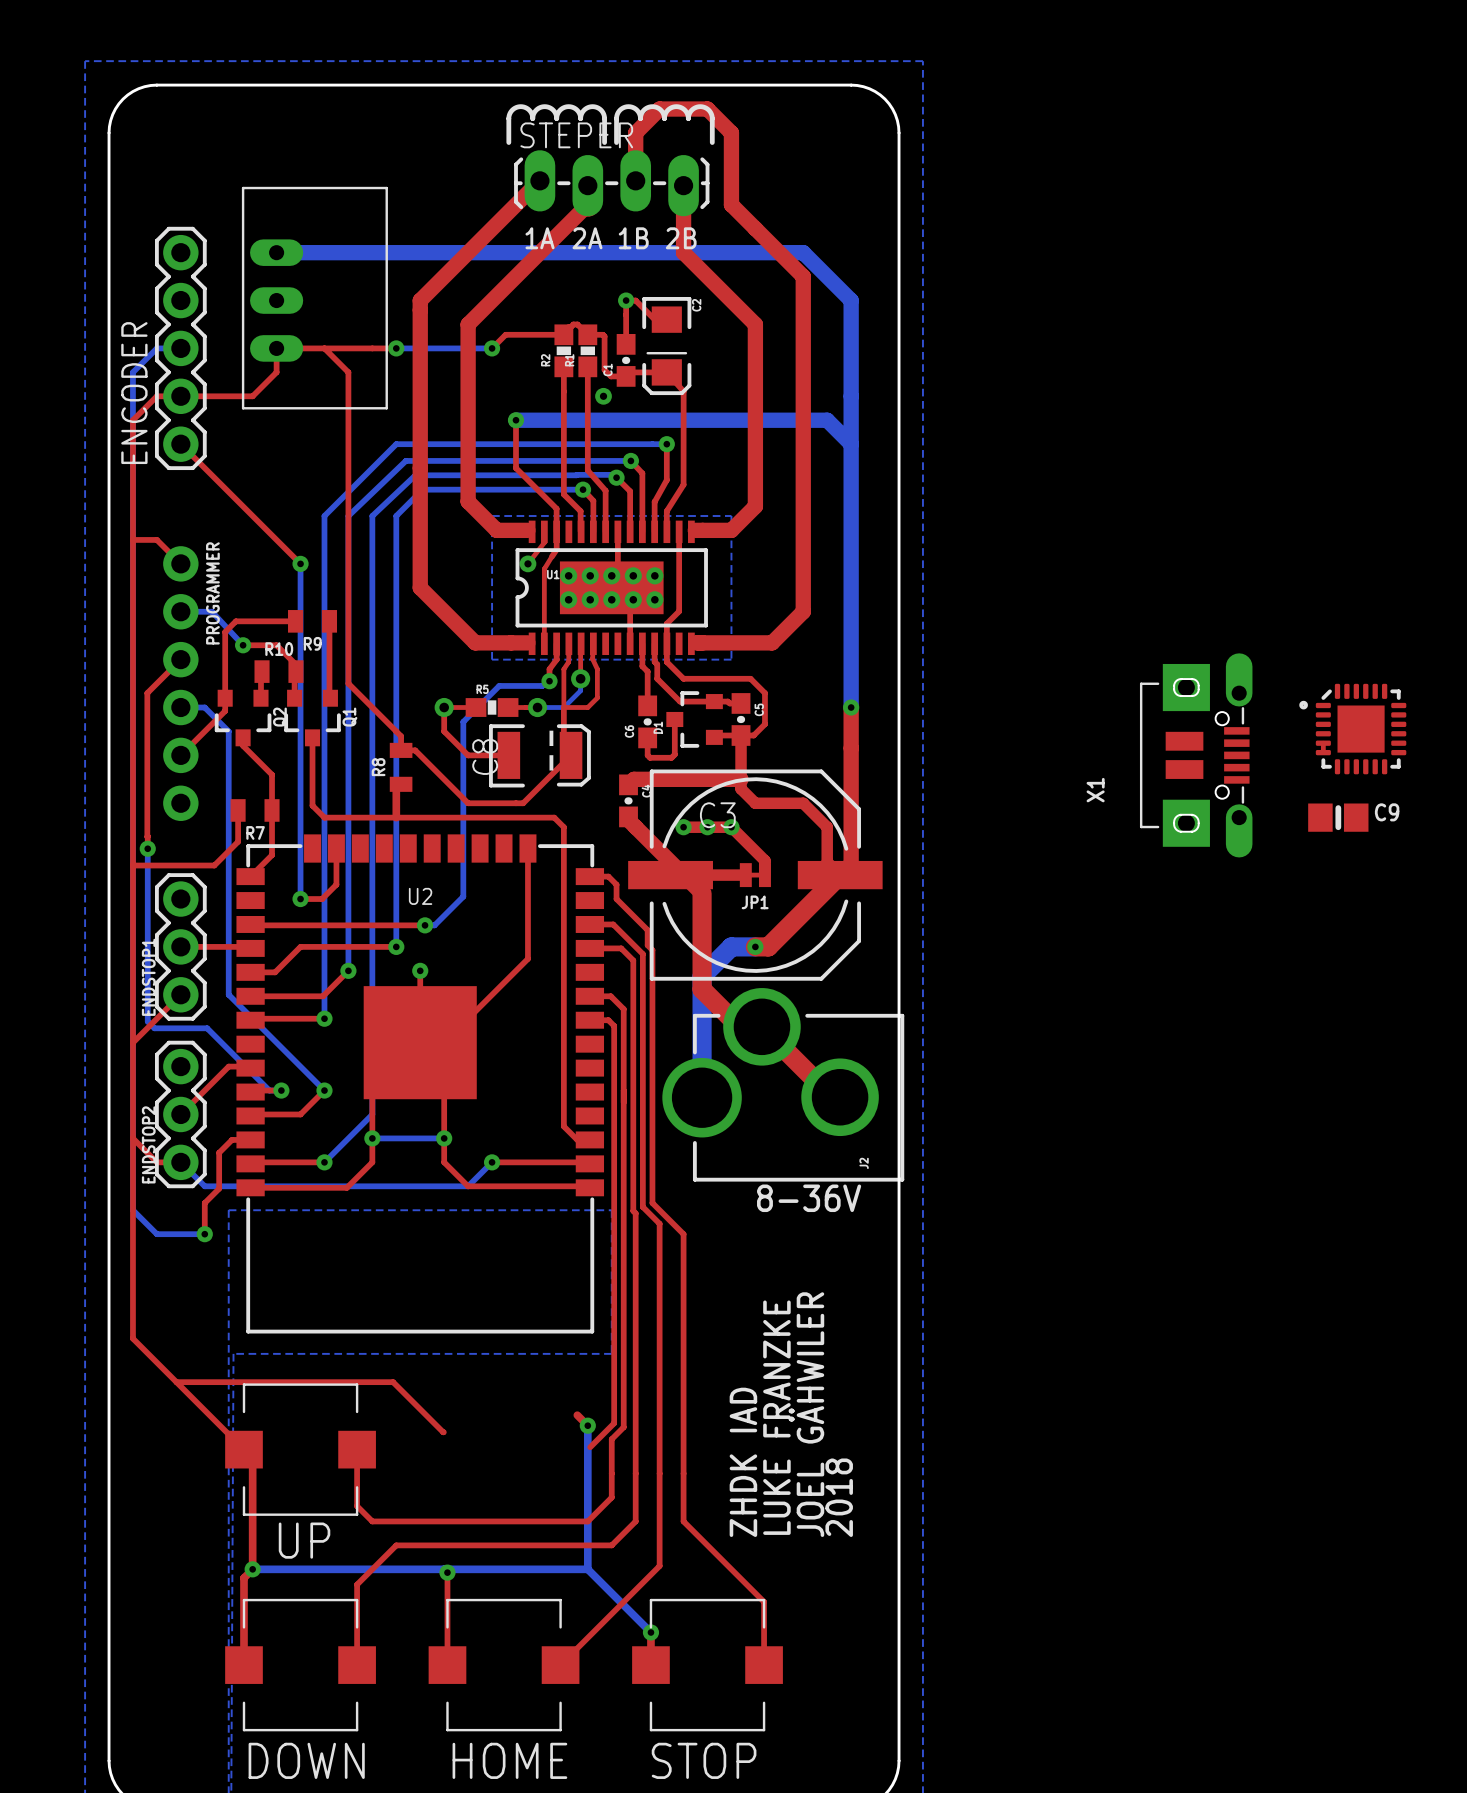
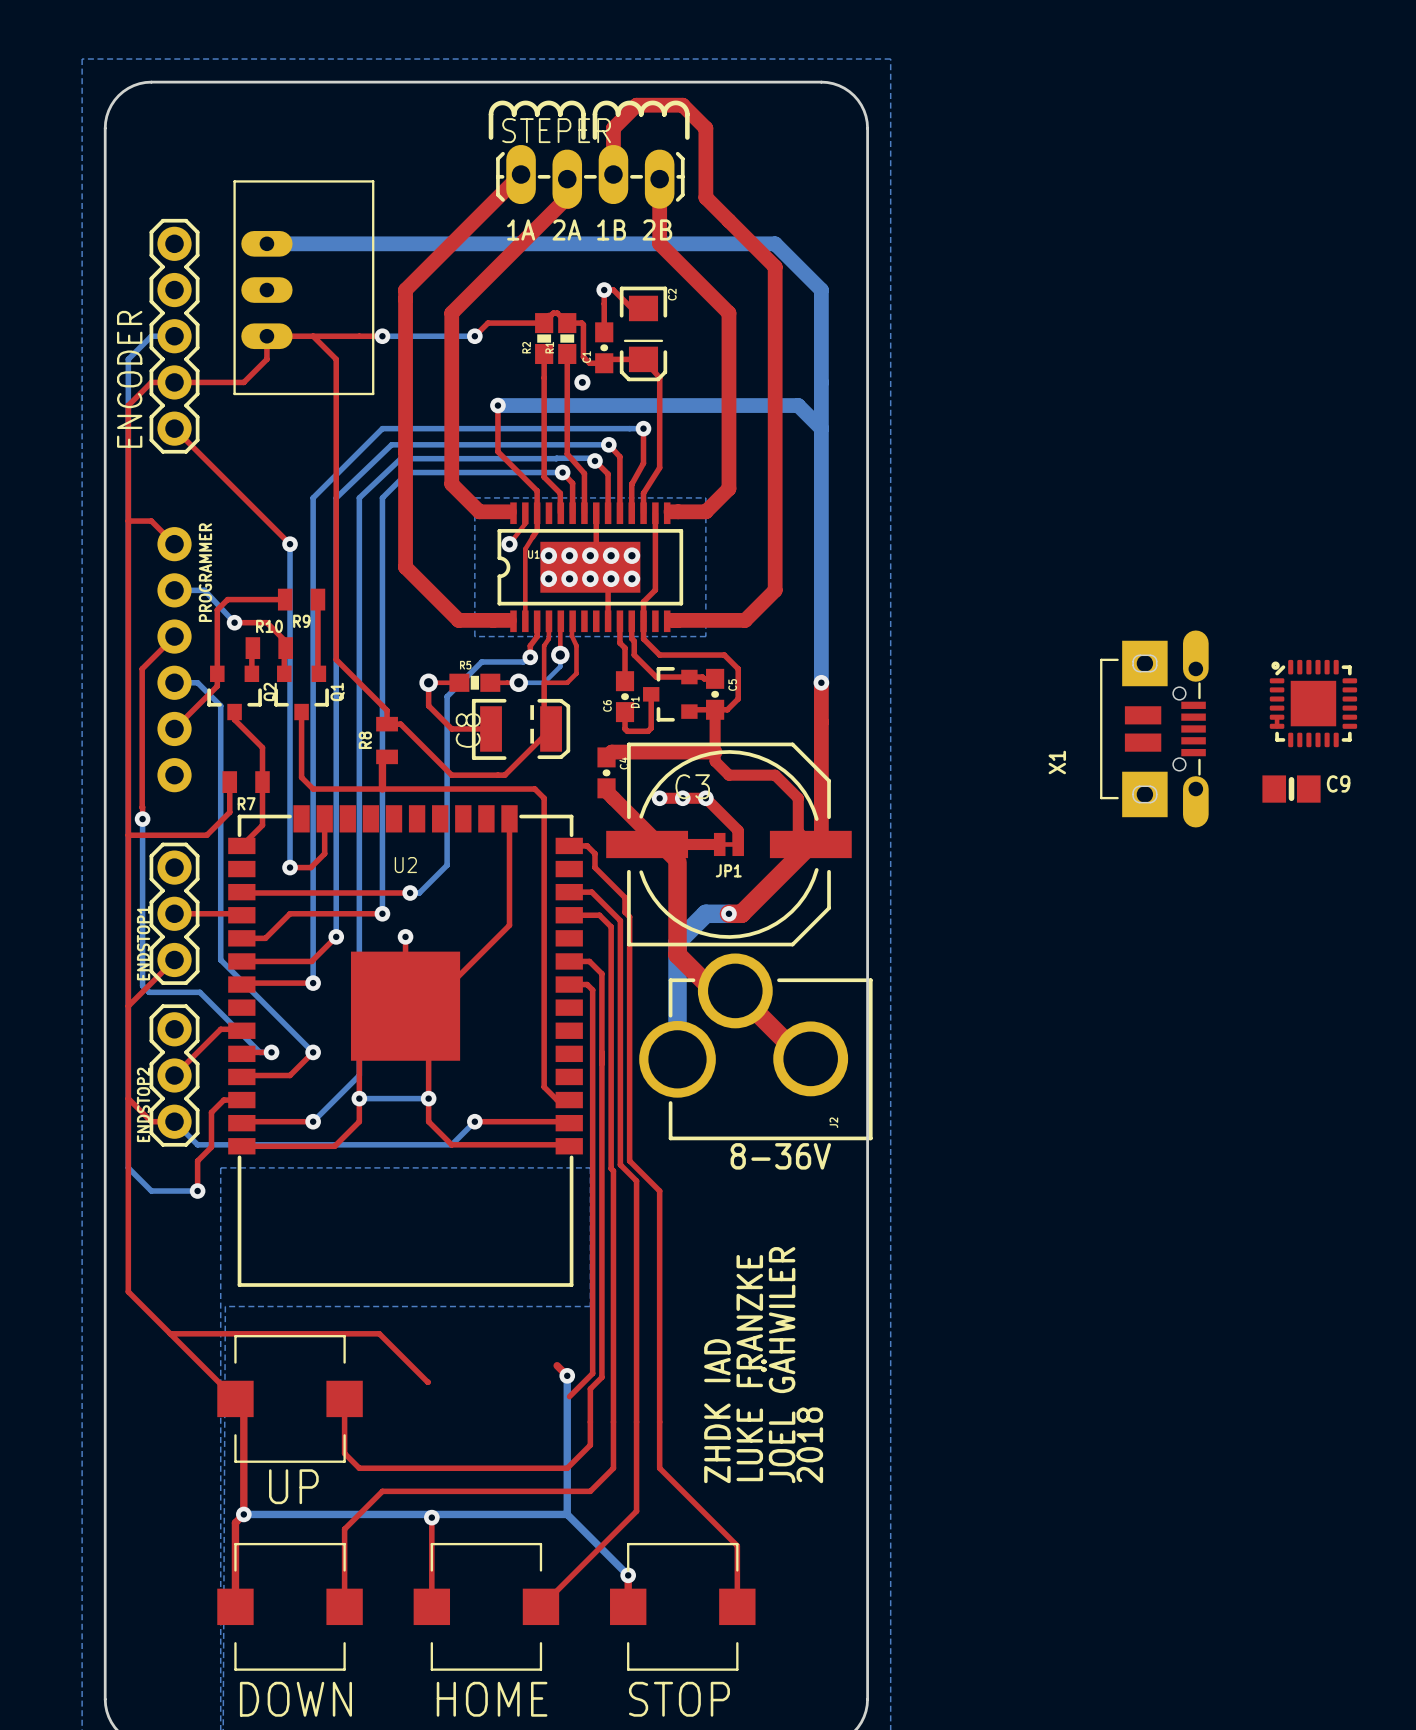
part footprint: [1299, 683, 1407, 775] -> [1269, 659, 1358, 748]

